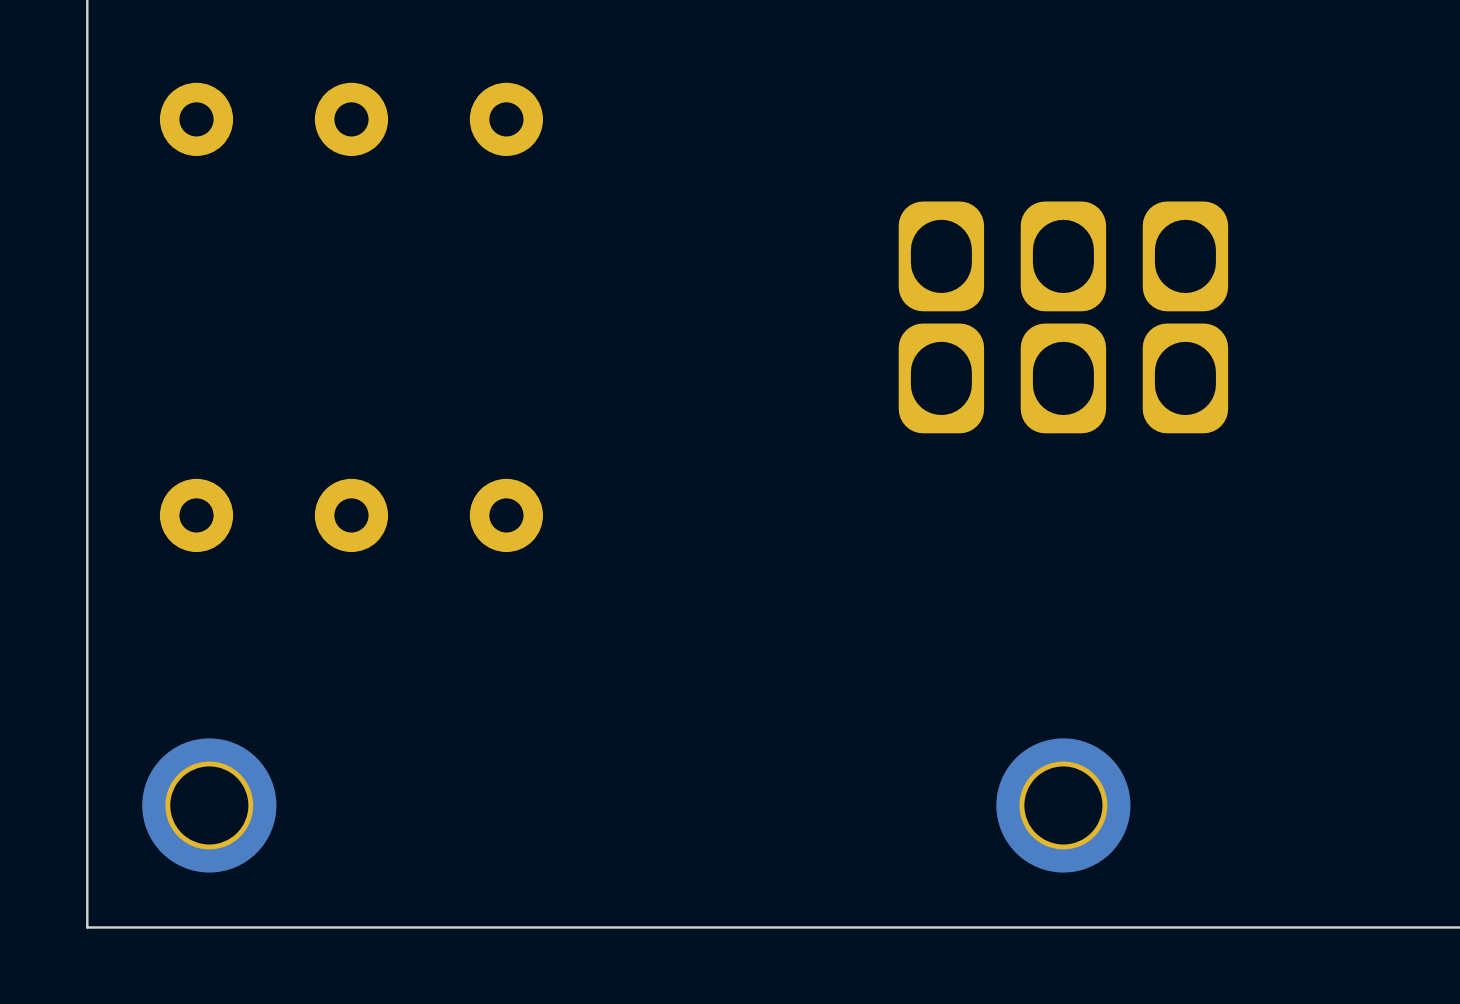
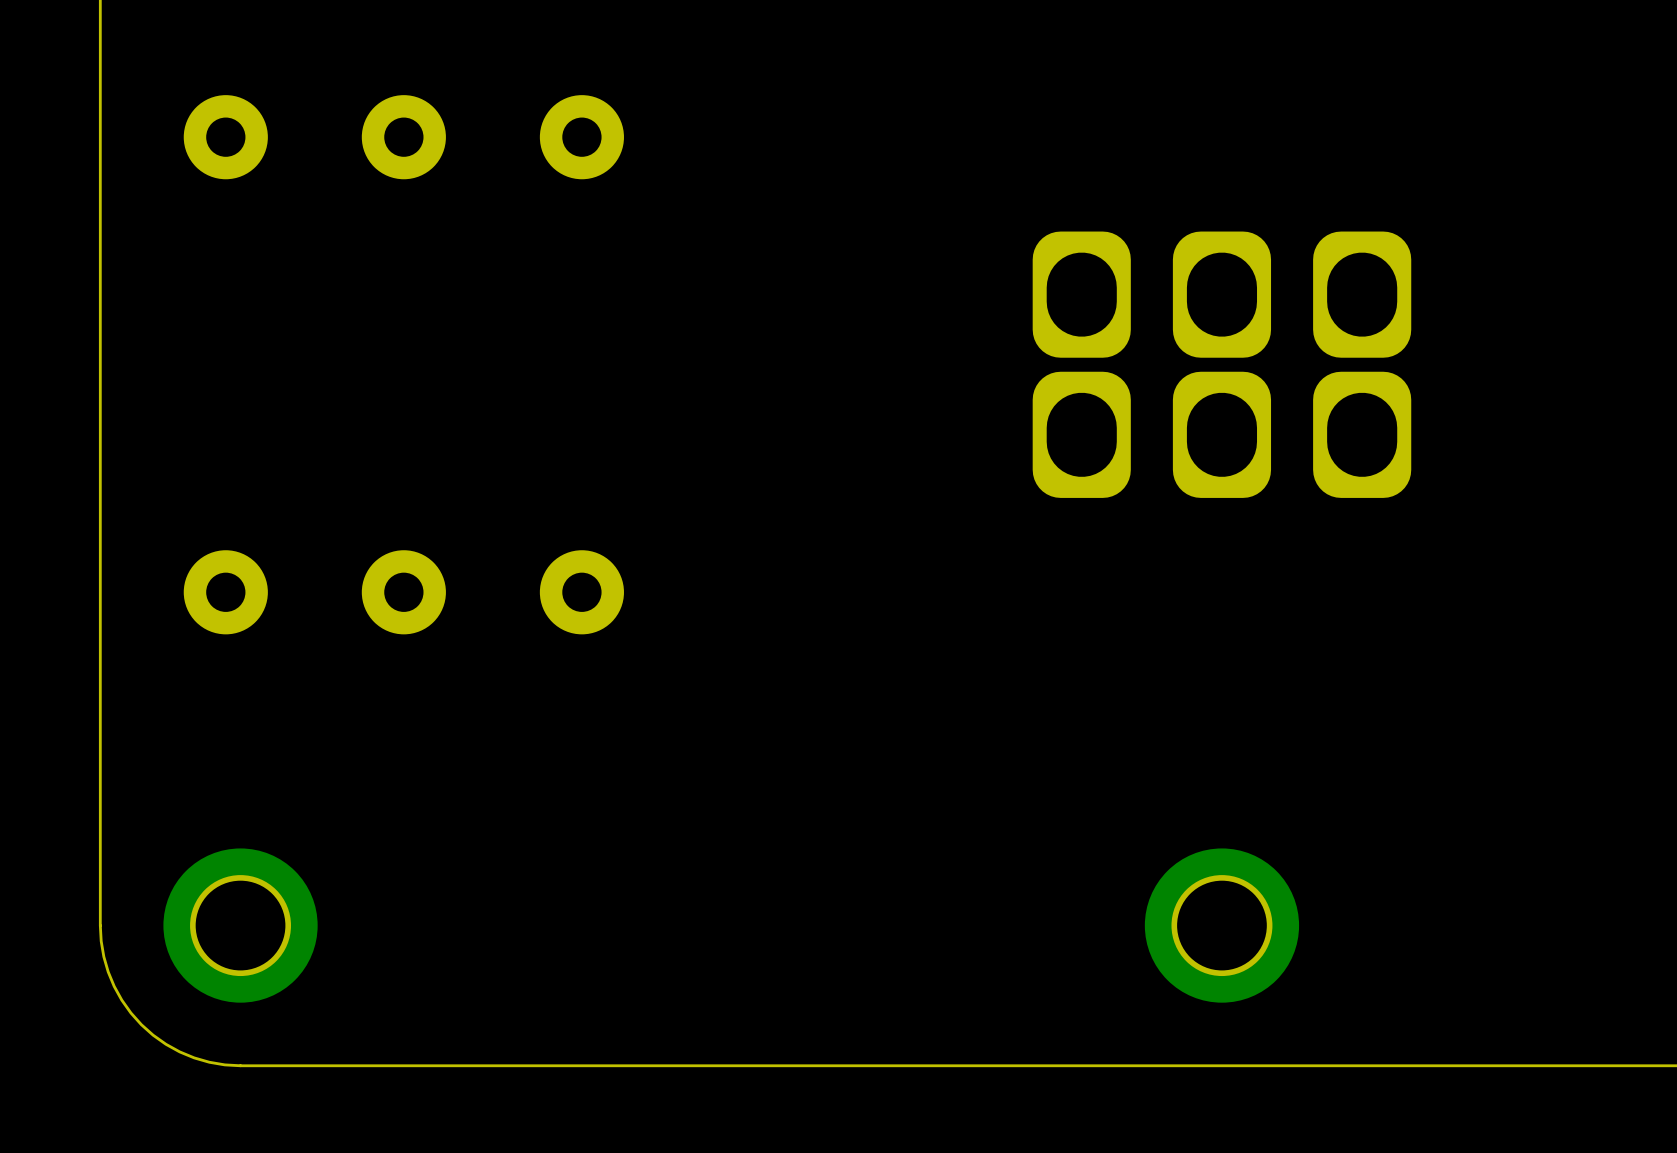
board edge: (87, 805) (87, 927) (209, 927) -> (100, 925) (101, 941) (108, 971) (121, 1000) (141, 1024) (165, 1044) (194, 1057) (224, 1064) (240, 1065)

